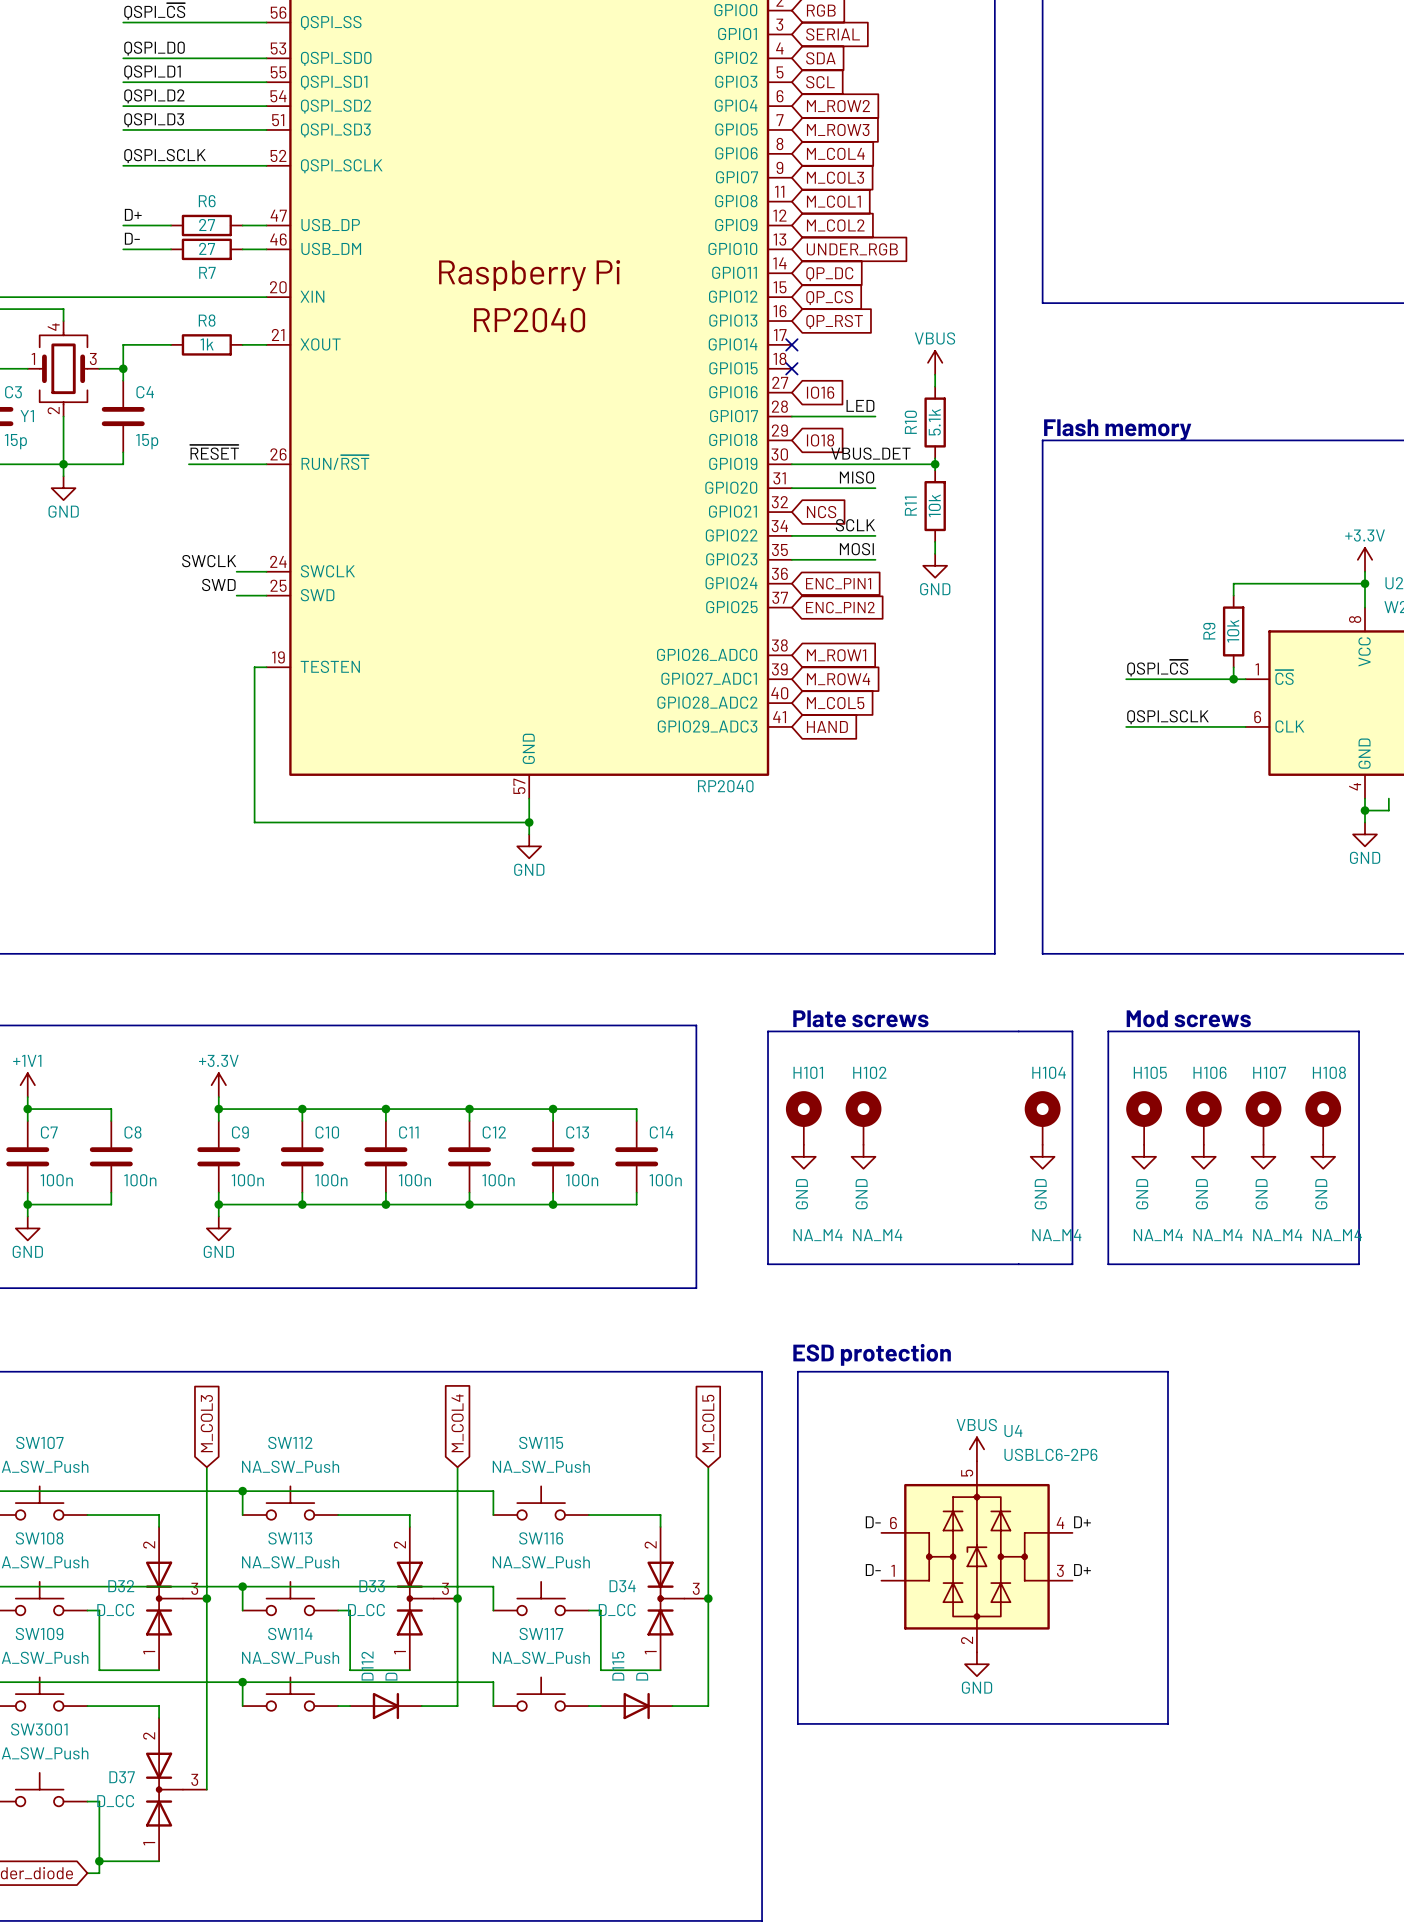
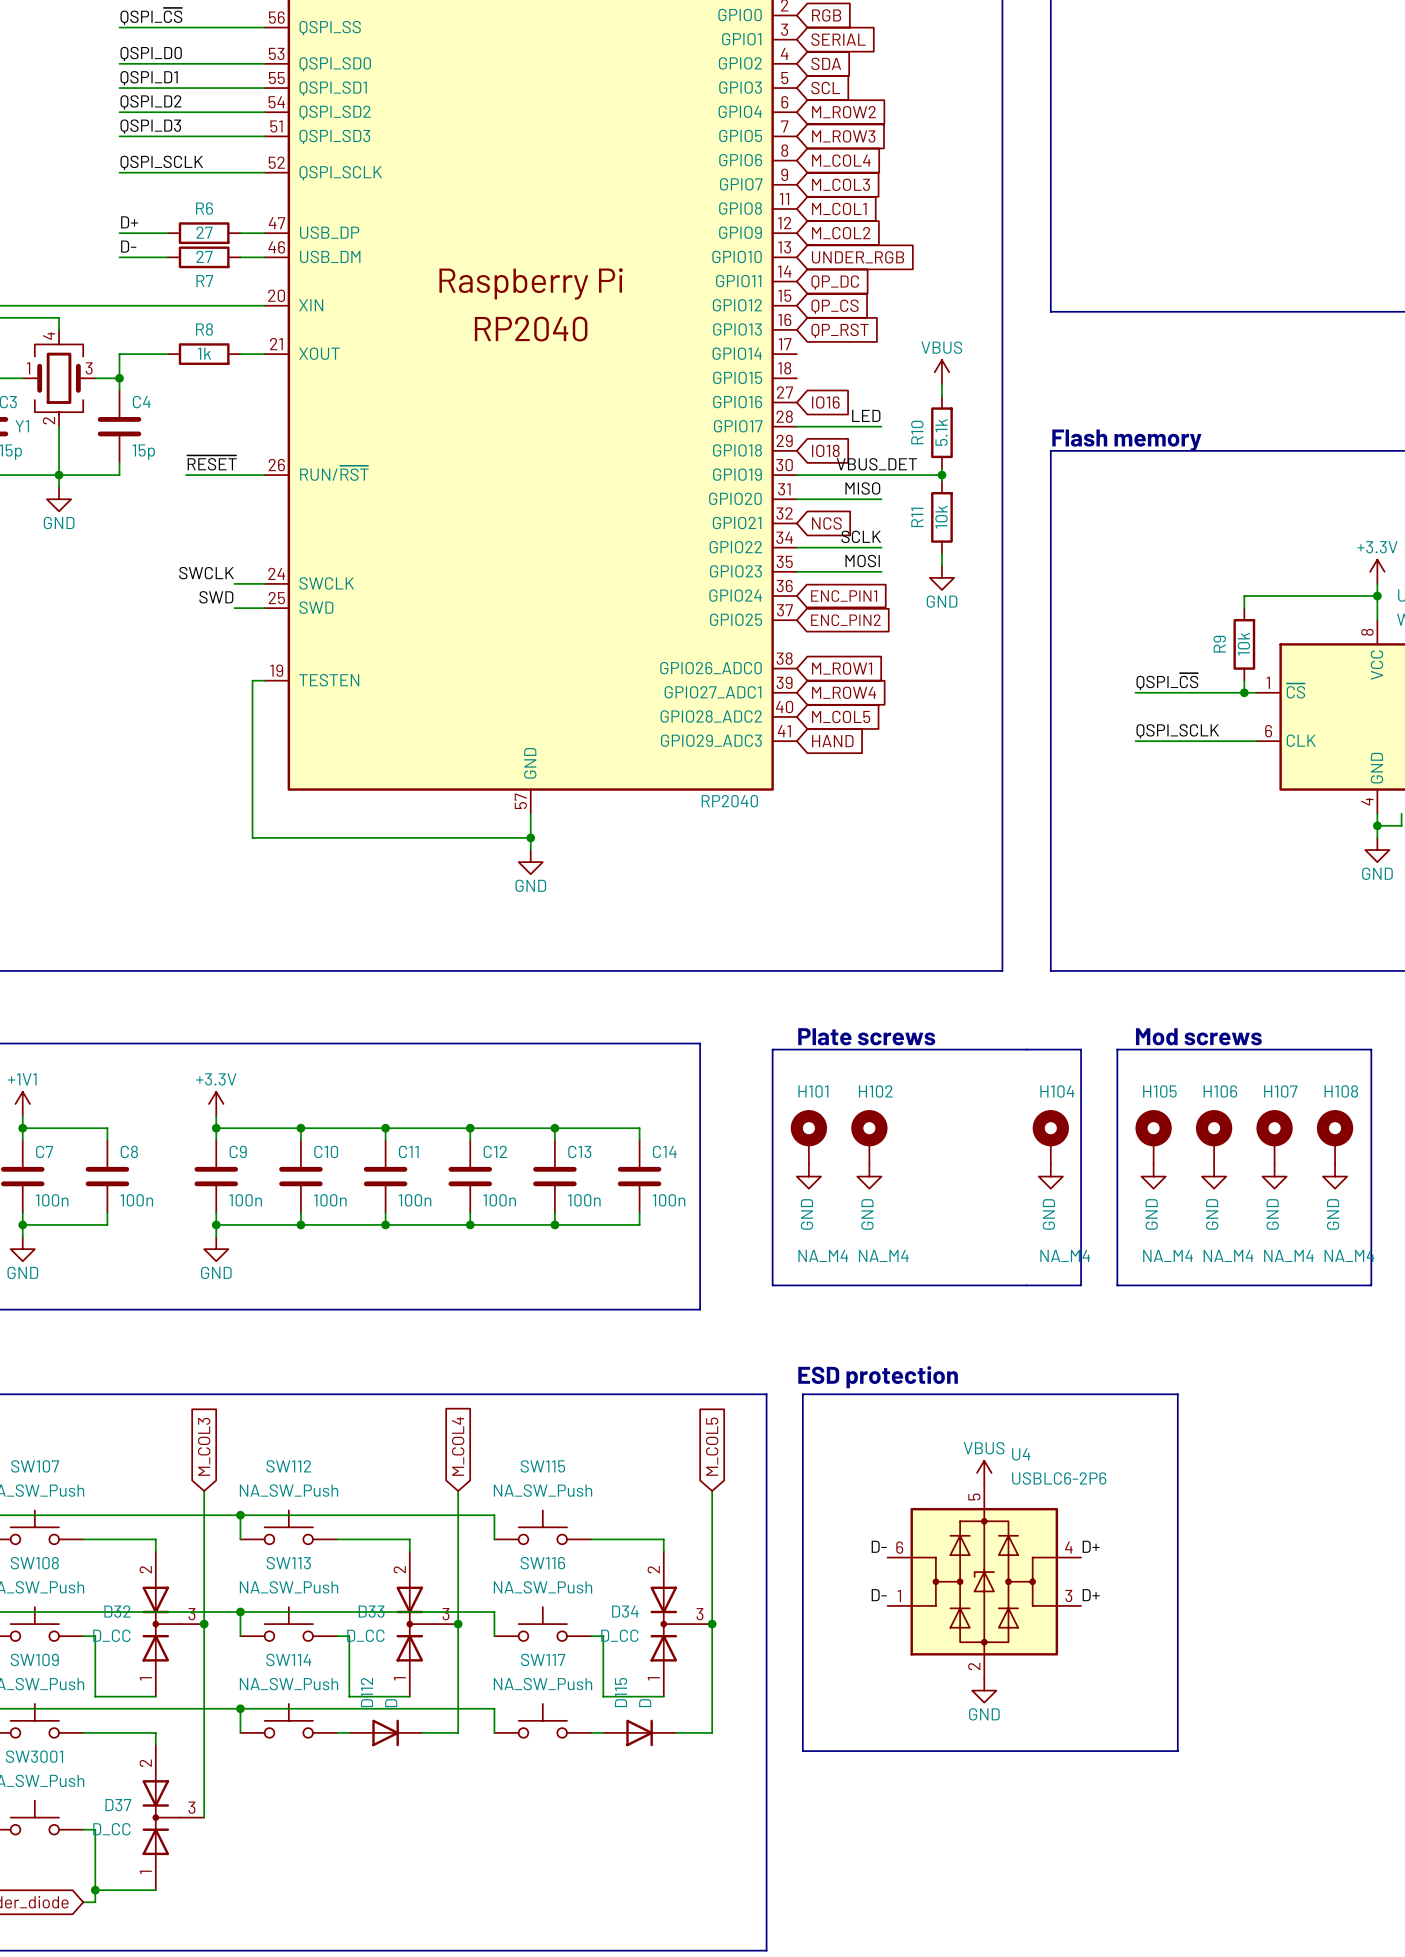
no-connect mark: (791, 344) -> none
no-connect mark: (791, 368) -> none

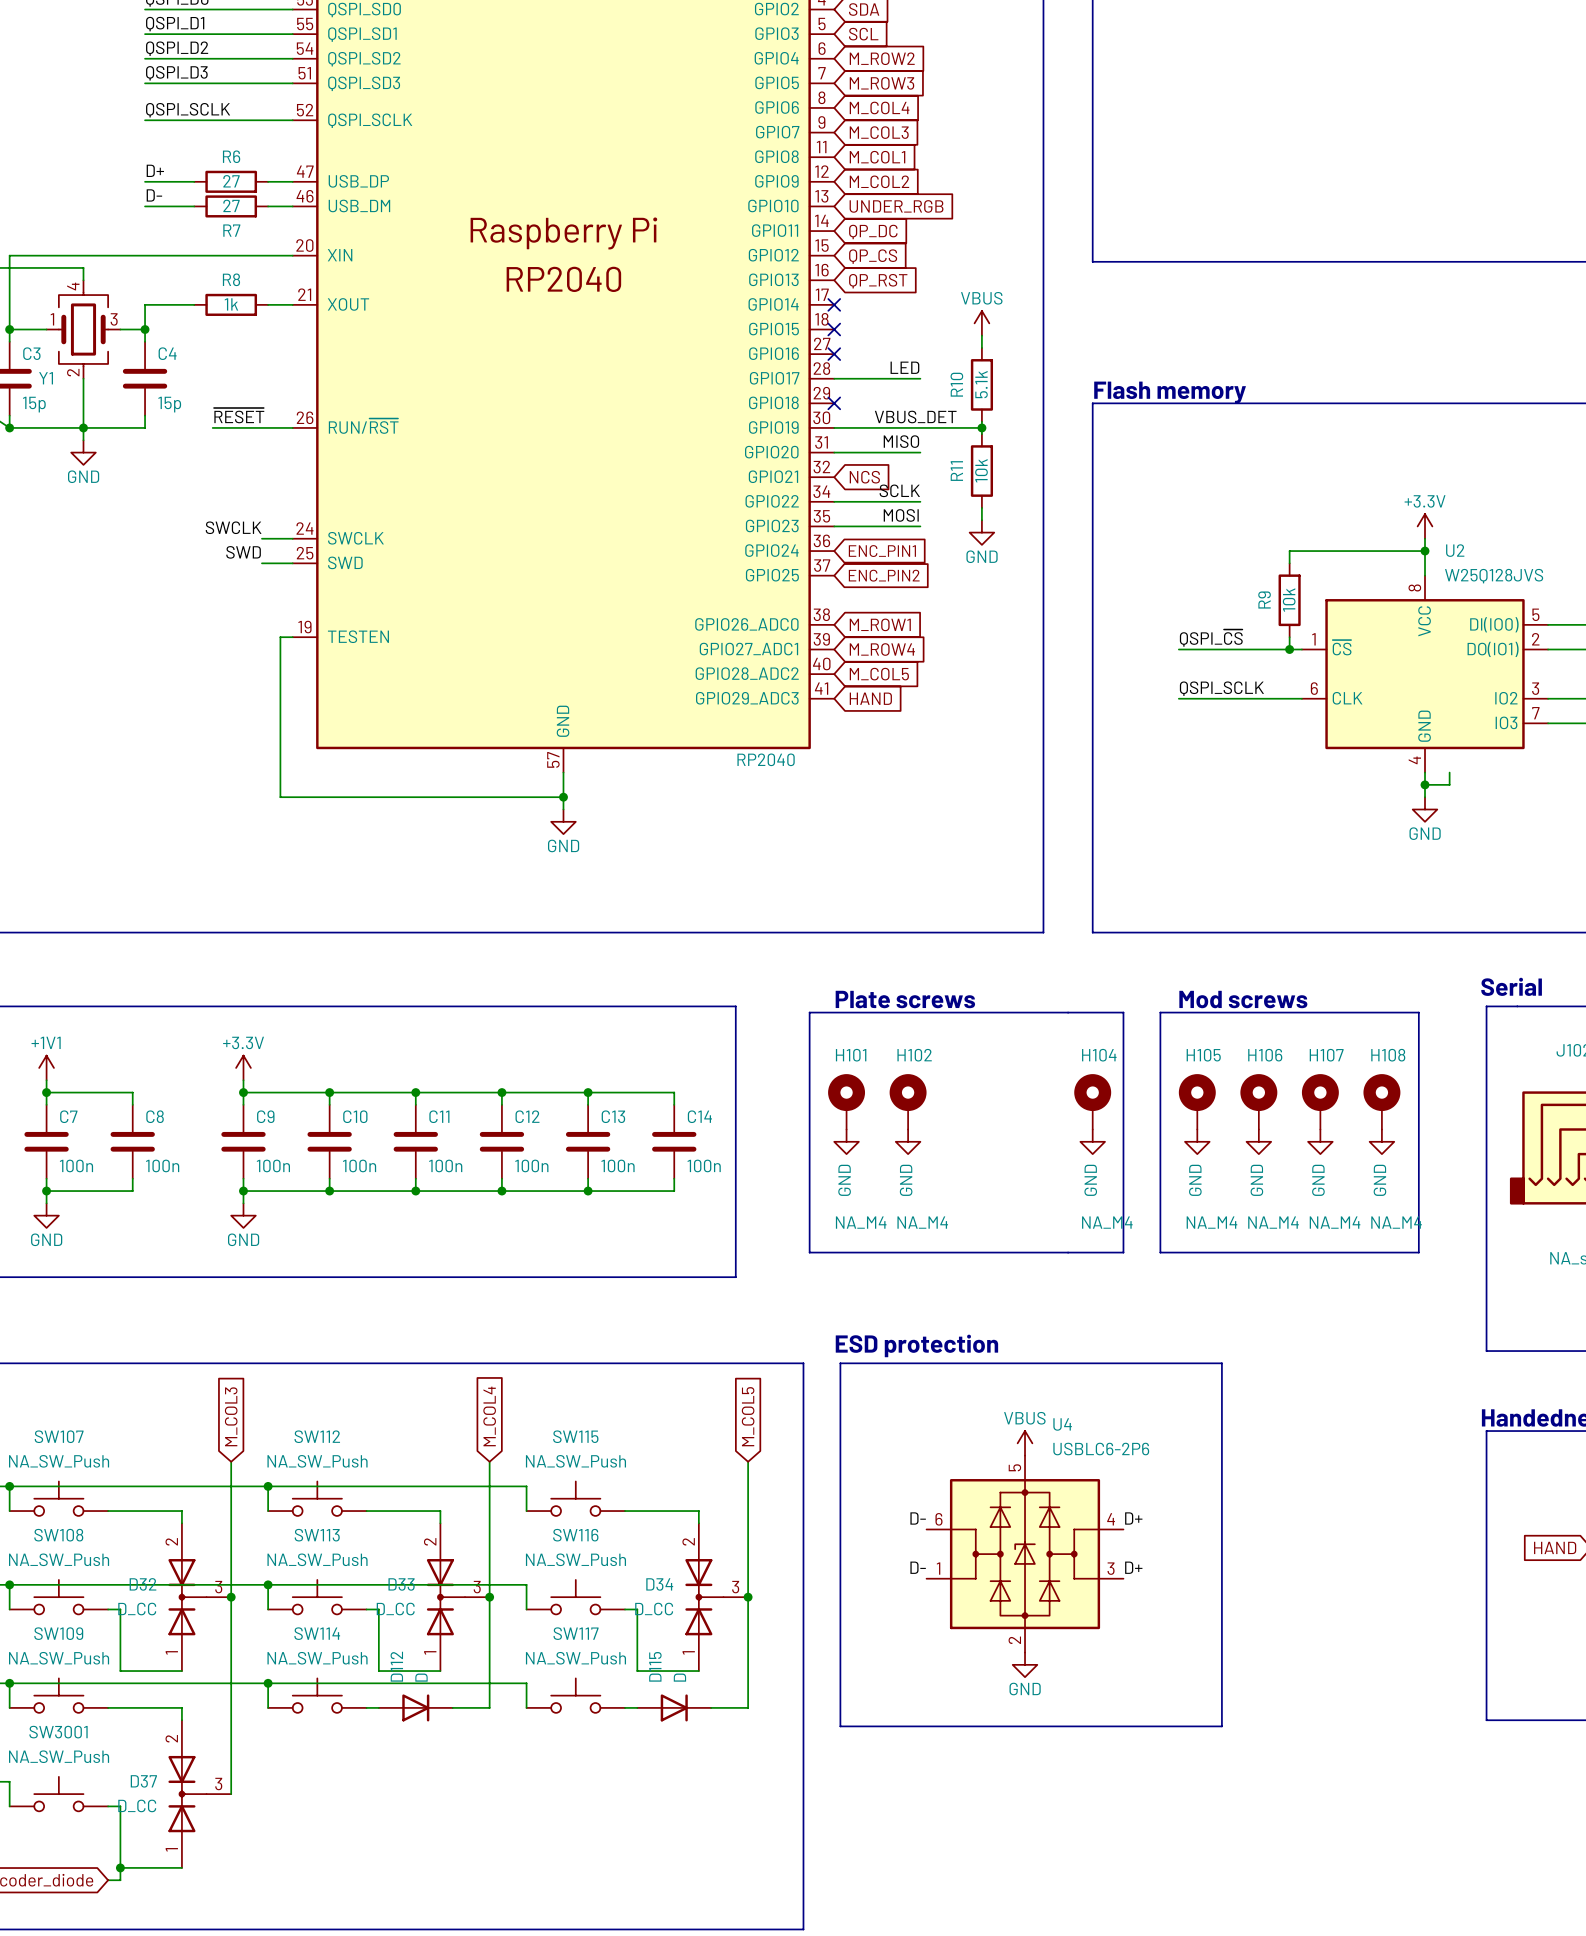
no-connect mark: none -> (834, 304)
no-connect mark: none -> (834, 329)
no-connect mark: none -> (834, 354)
global label: IO16 (825, 402) -> none
no-connect mark: none -> (834, 403)
global label: IO18 (825, 450) -> none

